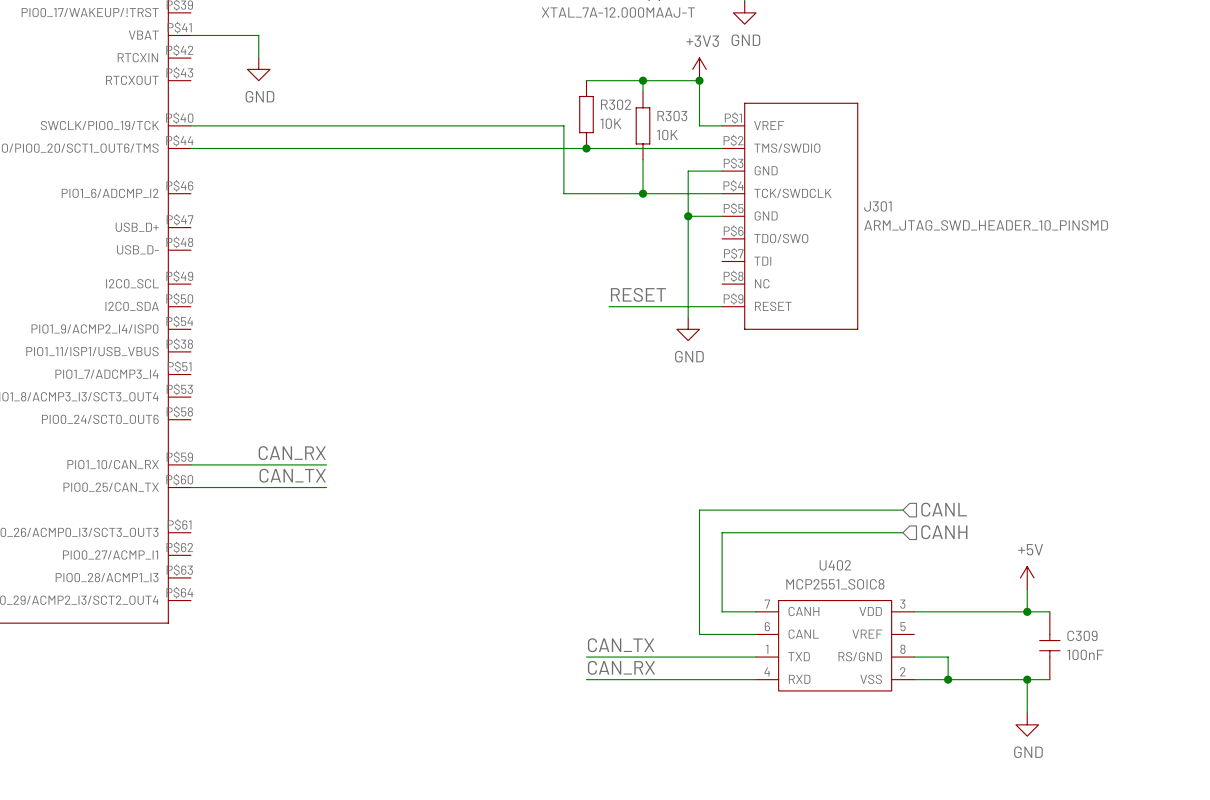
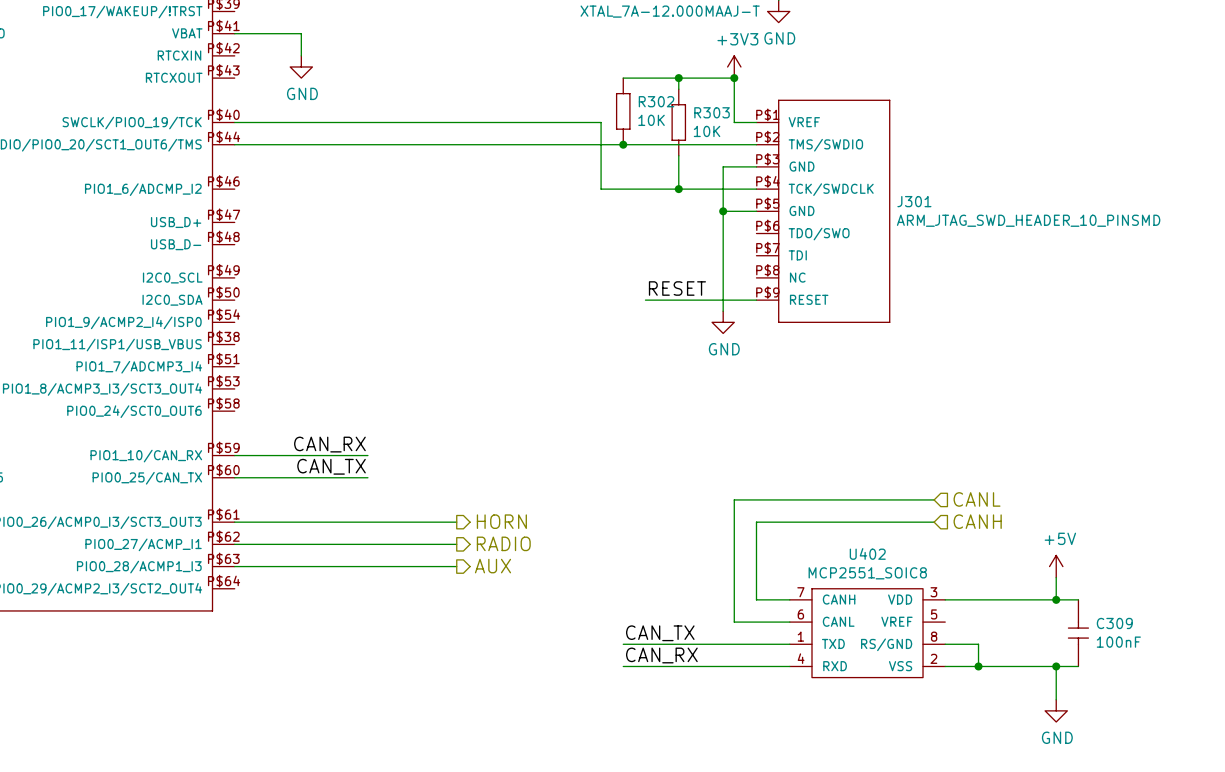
wire: none -> (234, 522) (456, 522)
hierarchical label: none -> HORN (501, 521)
hierarchical label: none -> RADIO (503, 543)
wire: none -> (234, 544) (456, 544)
wire: none -> (234, 566) (456, 566)
hierarchical label: none -> AUX (492, 566)

